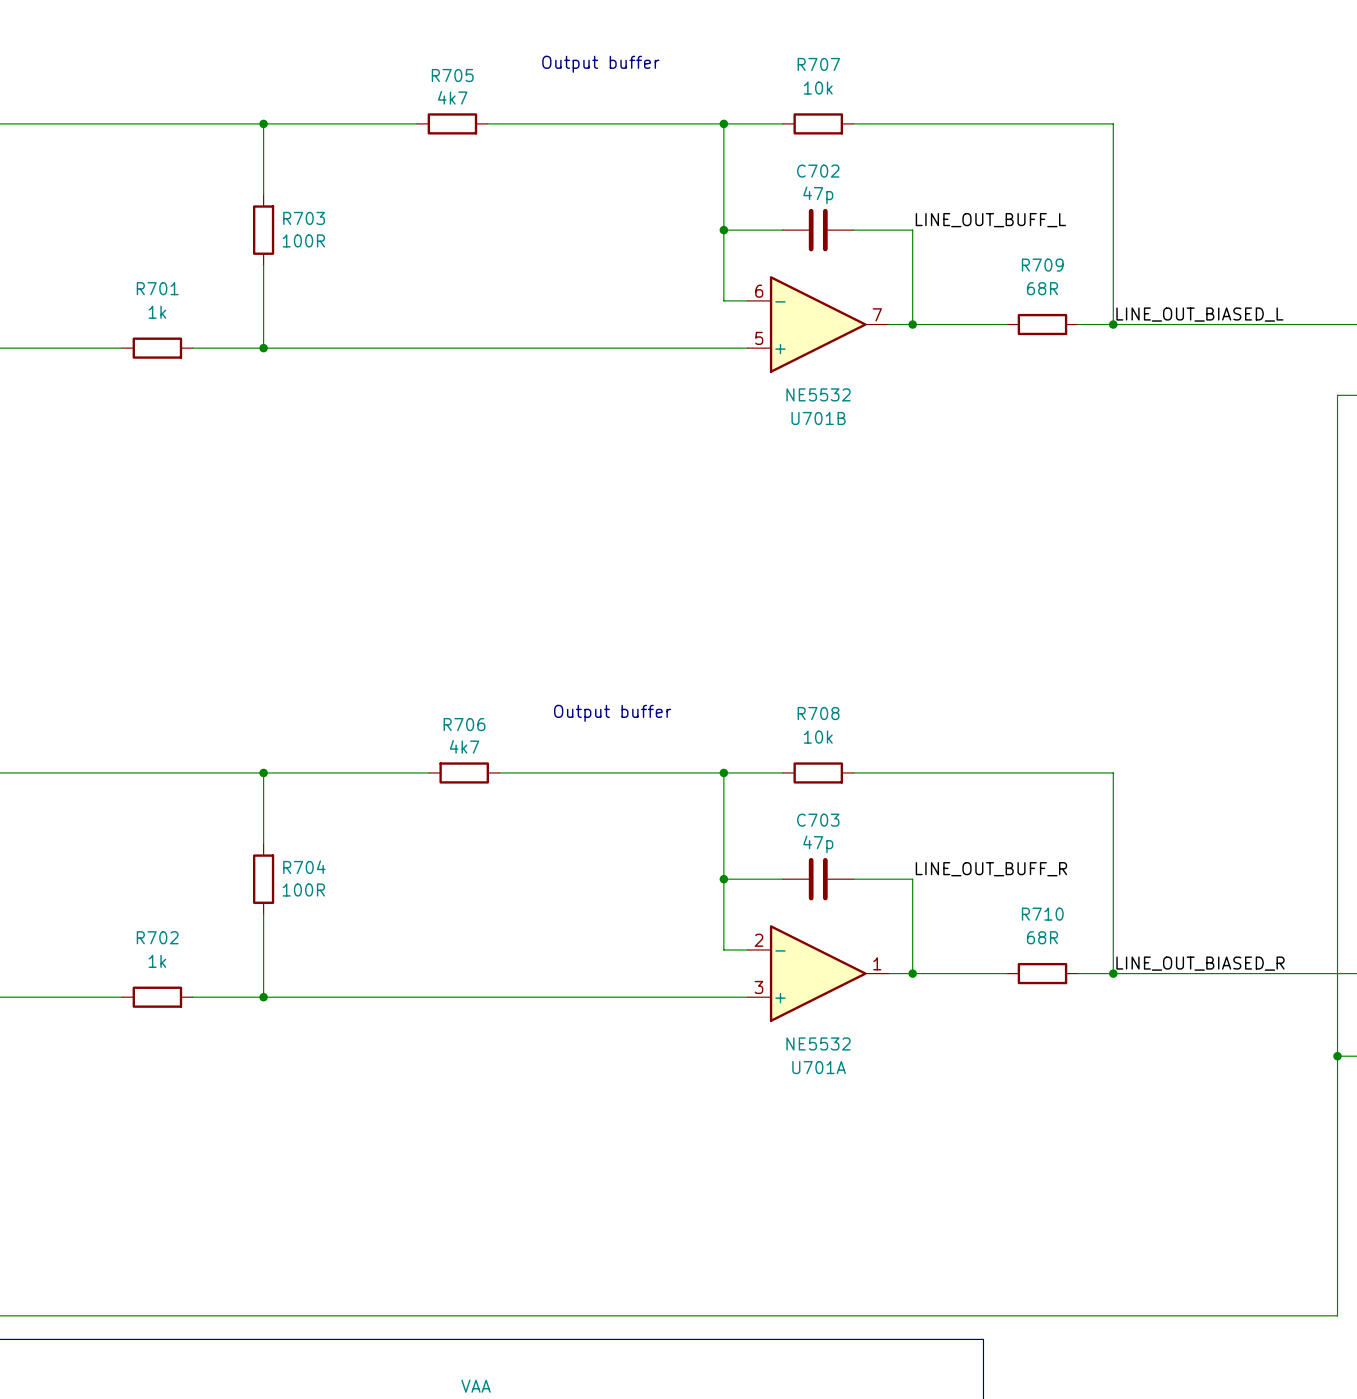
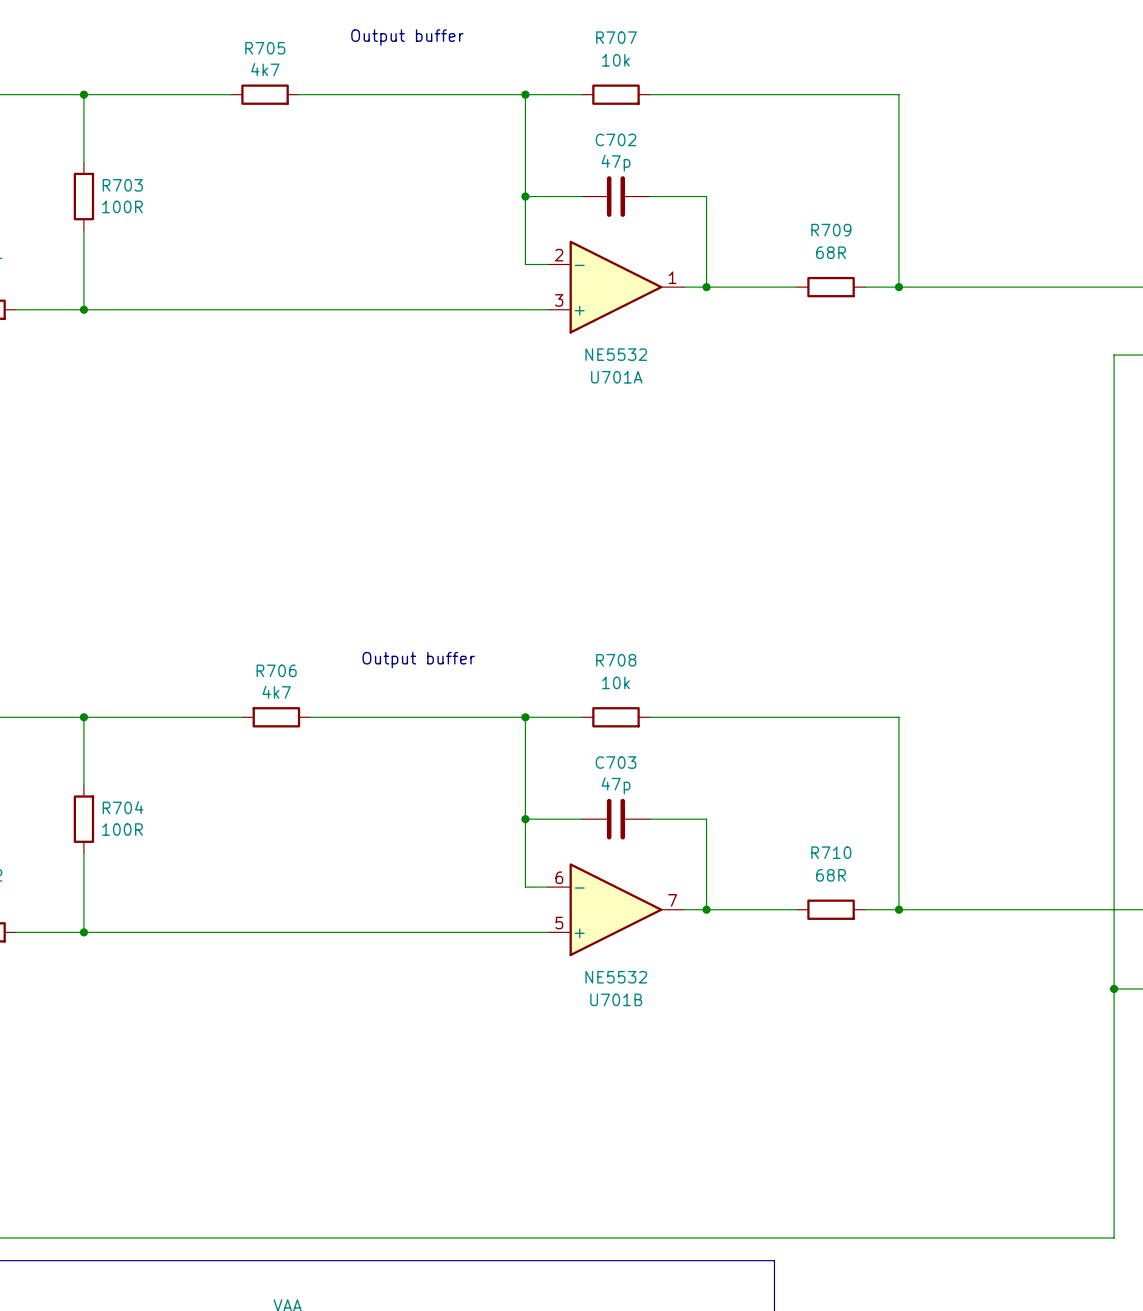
label: LINE_OUT_BUFF_L (990, 220) -> none
label: LINE_OUT_BIASED_L (1199, 314) -> none
U701B position: (818, 324) -> (615, 909)
label: LINE_OUT_BUFF_R (991, 869) -> none
label: LINE_OUT_BIASED_R (1200, 963) -> none
U701A position: (818, 973) -> (615, 287)

